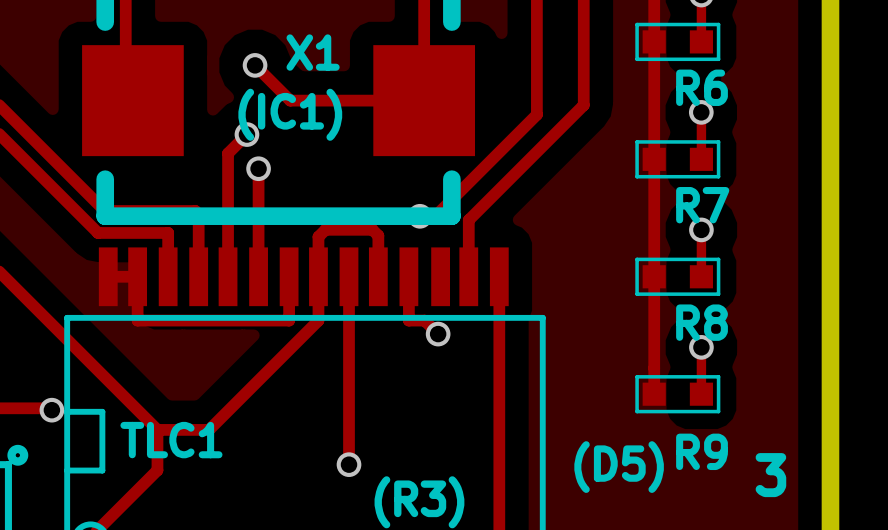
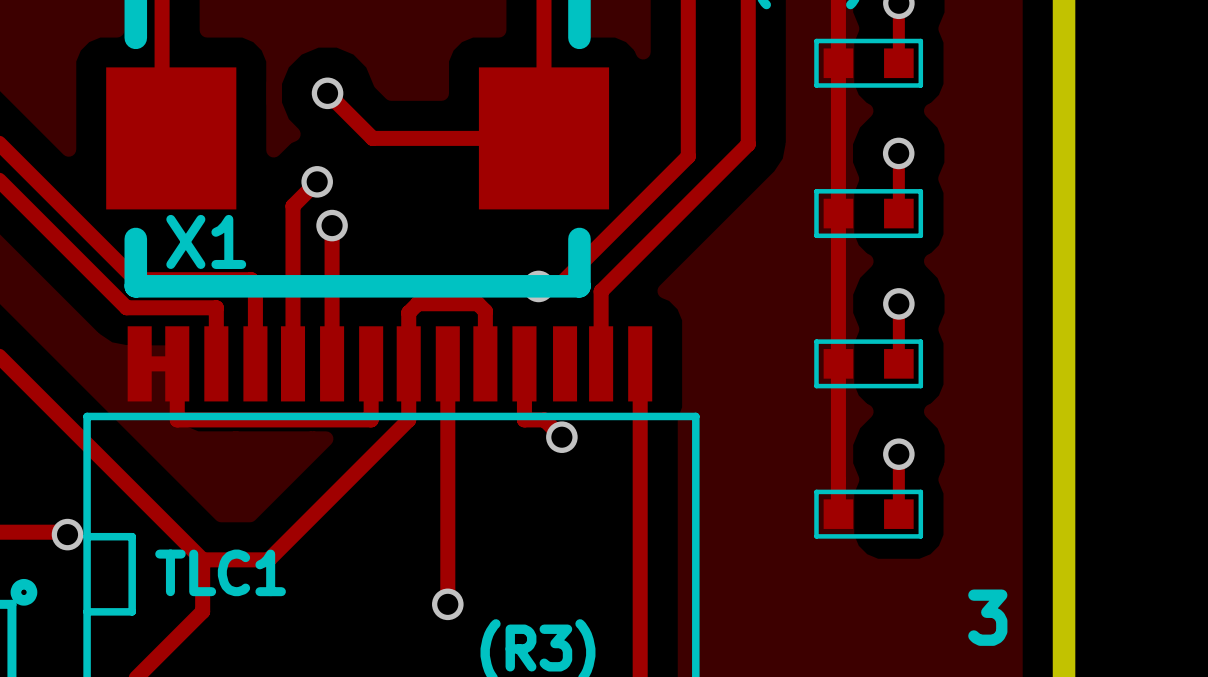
X1 name position: X1 (313, 52) -> X1 (206, 241)
R6 name: R6 (702, 87) -> none
text: (IC1) (290, 114) -> none
R7 name: R7 (702, 205) -> none
R8 name: R8 (702, 322) -> none
R9 name: R9 (702, 451) -> none
text: (D5) (619, 467) -> none

